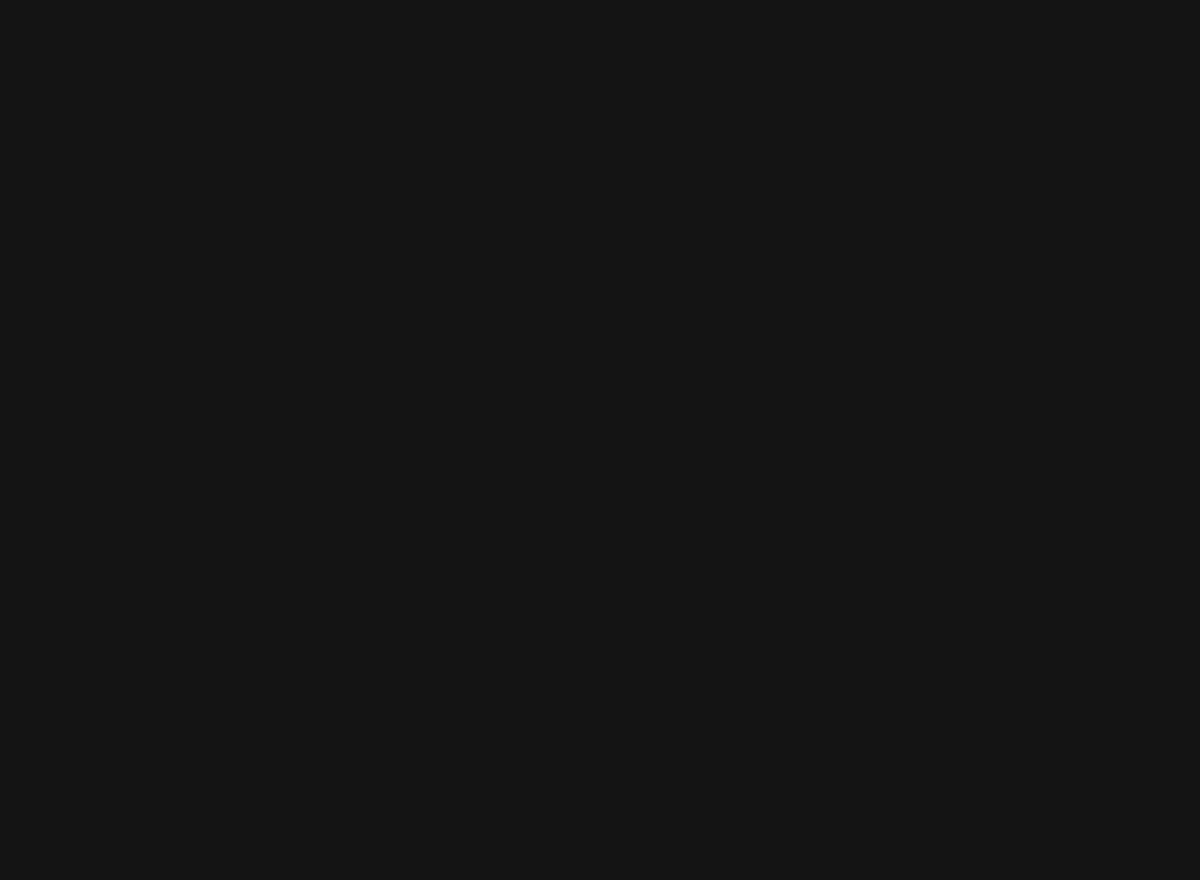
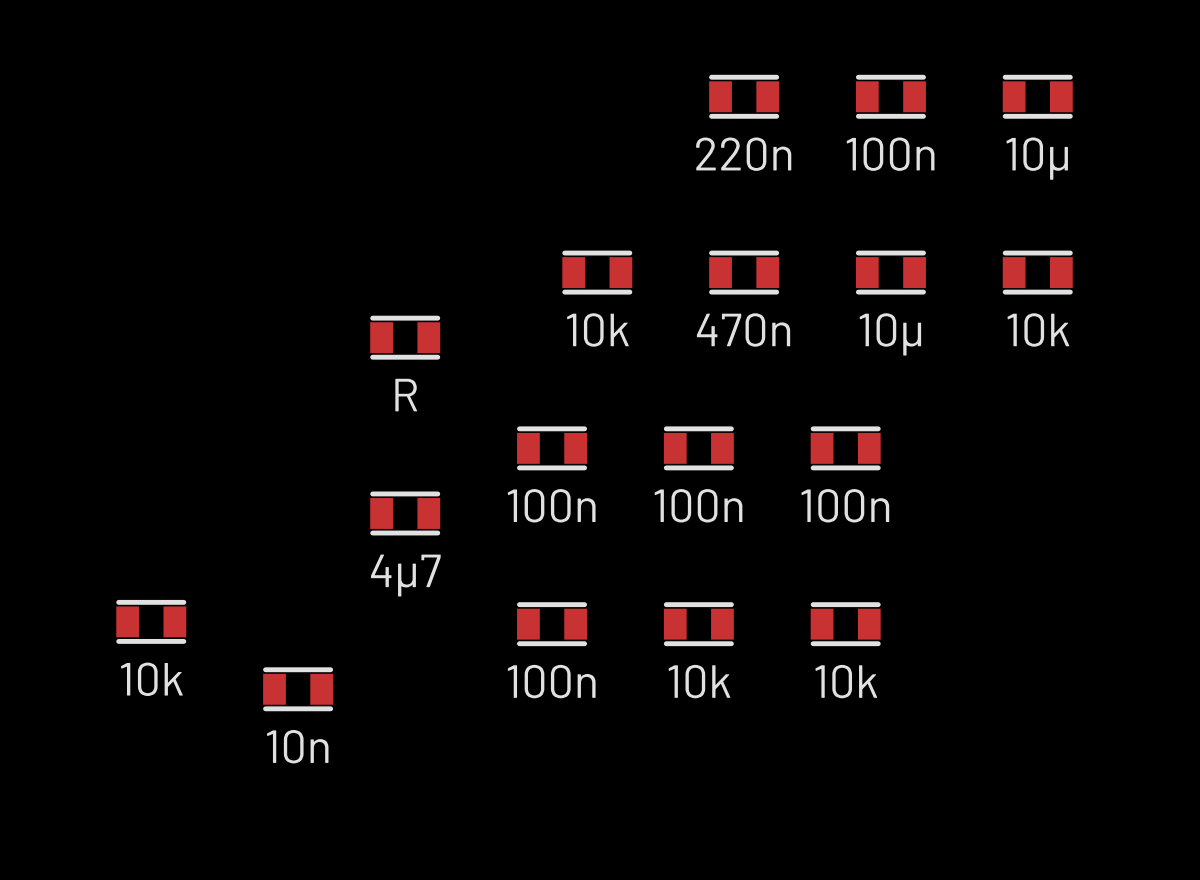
part: none -> 220n (744, 96)
part: none -> 100n (890, 96)
part: none -> 10µ (1037, 96)
part: none -> 10k (597, 272)
part: none -> 470n (744, 272)
part: none -> 10µ (890, 272)
part: none -> 10k (1037, 272)
part: none -> R (405, 337)
part: none -> 100n (552, 448)
part: none -> 100n (698, 448)
part: none -> 100n (845, 448)
part: none -> 4µ7 (405, 513)
part: none -> 10k (151, 621)
part: none -> 100n (552, 624)
part: none -> 10k (698, 624)
part: none -> 10k (845, 624)
part: none -> 10n (298, 689)

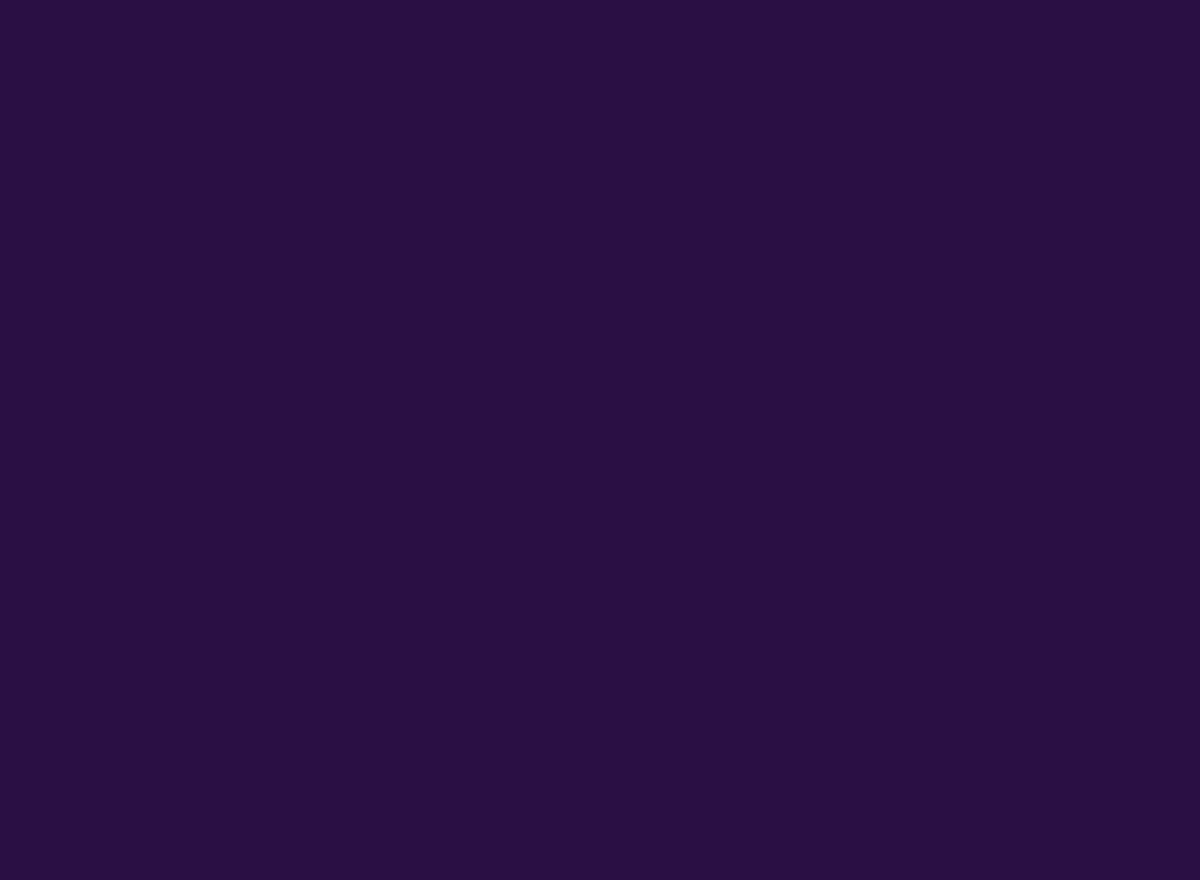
part: 220n (744, 96) -> none
part: 100n (890, 96) -> none
part: 10µ (1037, 96) -> none
part: 10k (597, 272) -> none
part: 470n (744, 272) -> none
part: 10µ (890, 272) -> none
part: 10k (1037, 272) -> none
part: R (405, 337) -> none
part: 100n (552, 448) -> none
part: 100n (698, 448) -> none
part: 100n (845, 448) -> none
part: 4µ7 (405, 513) -> none
part: 10k (151, 621) -> none
part: 100n (552, 624) -> none
part: 10k (698, 624) -> none
part: 10k (845, 624) -> none
part: 10n (298, 689) -> none

